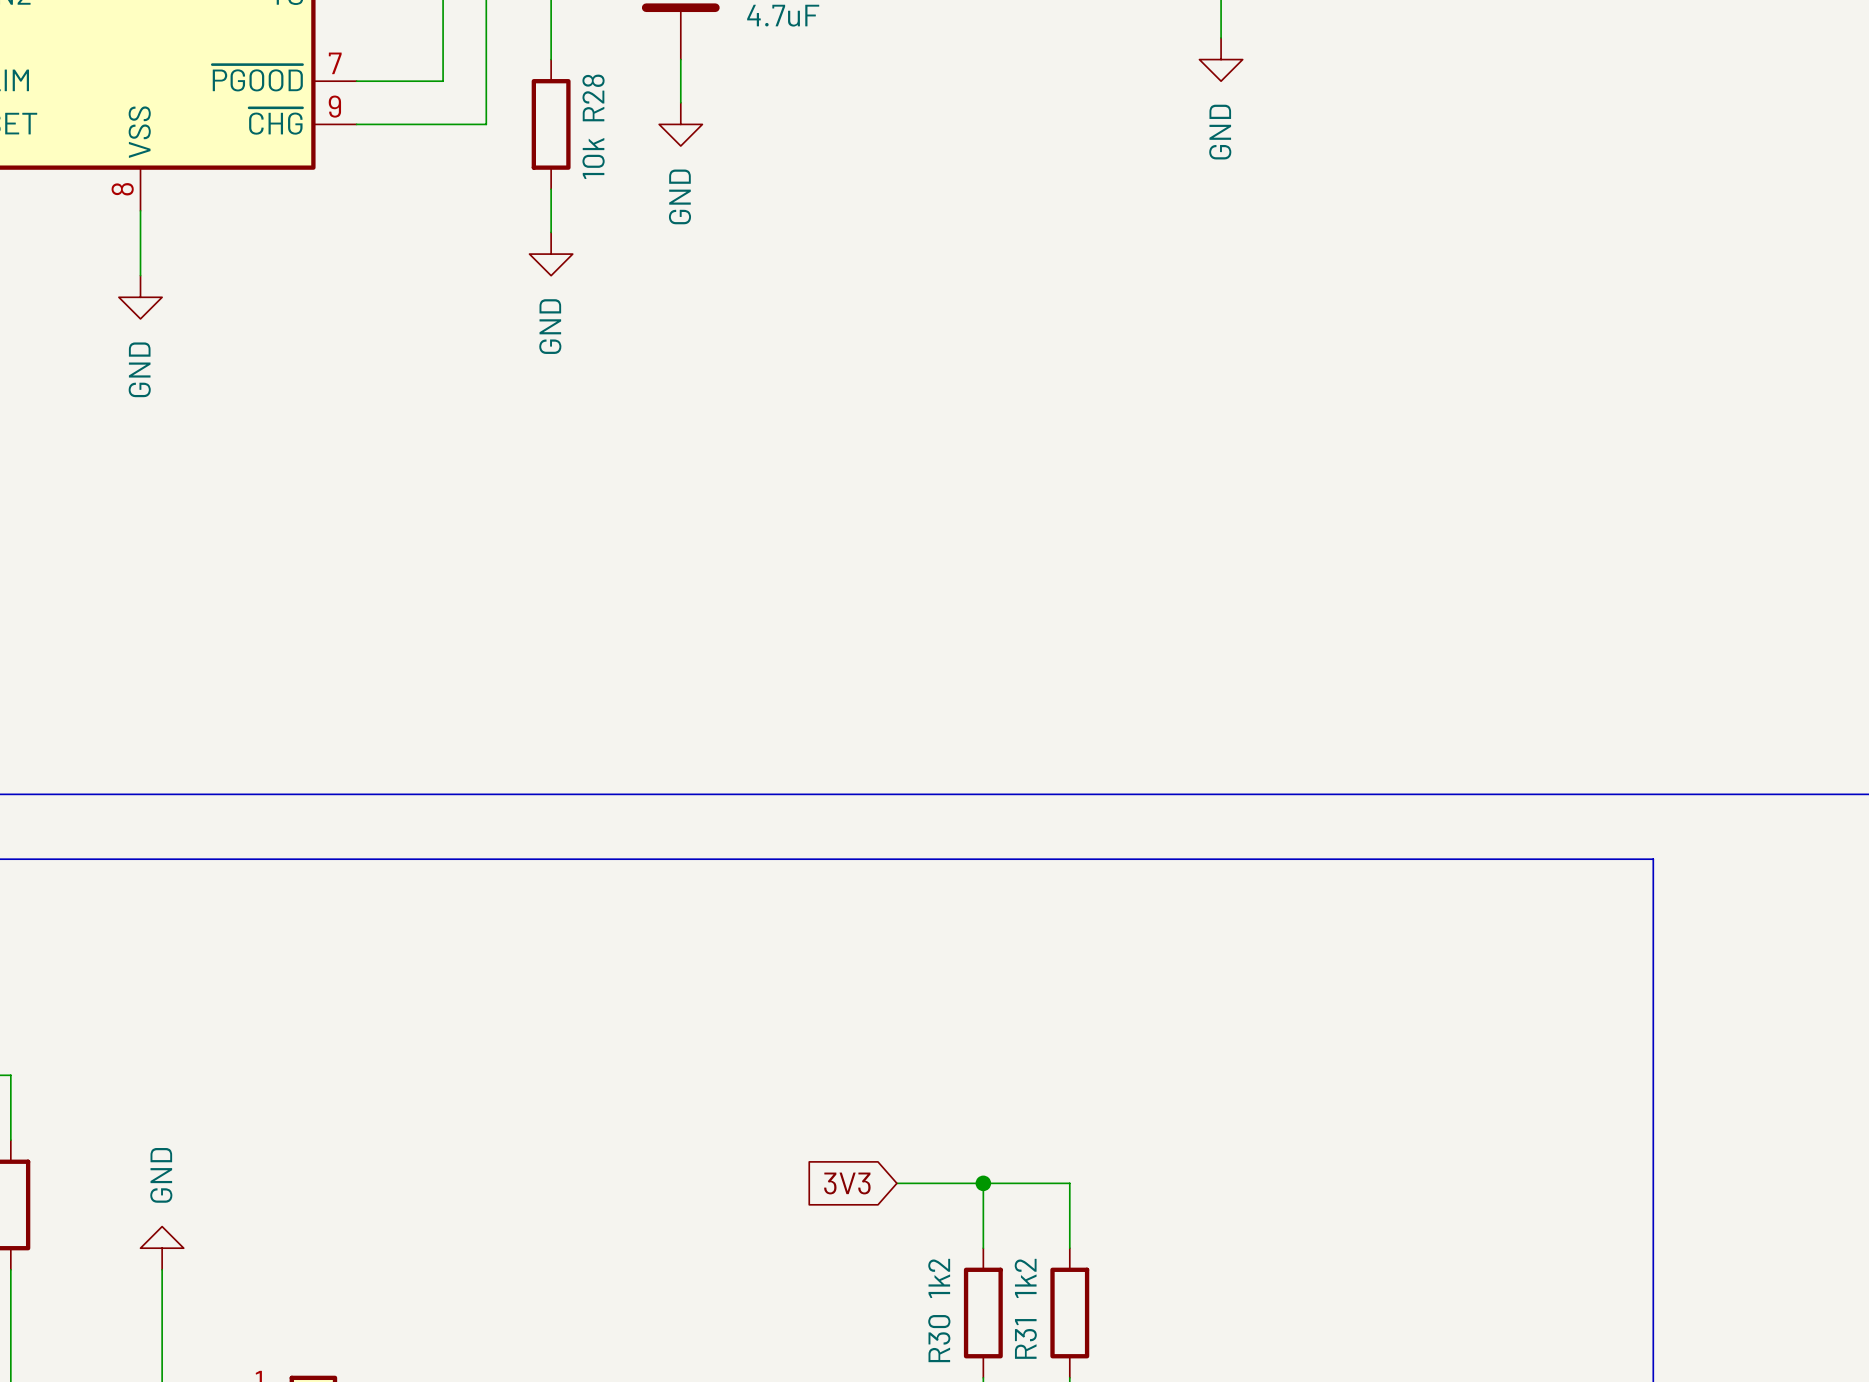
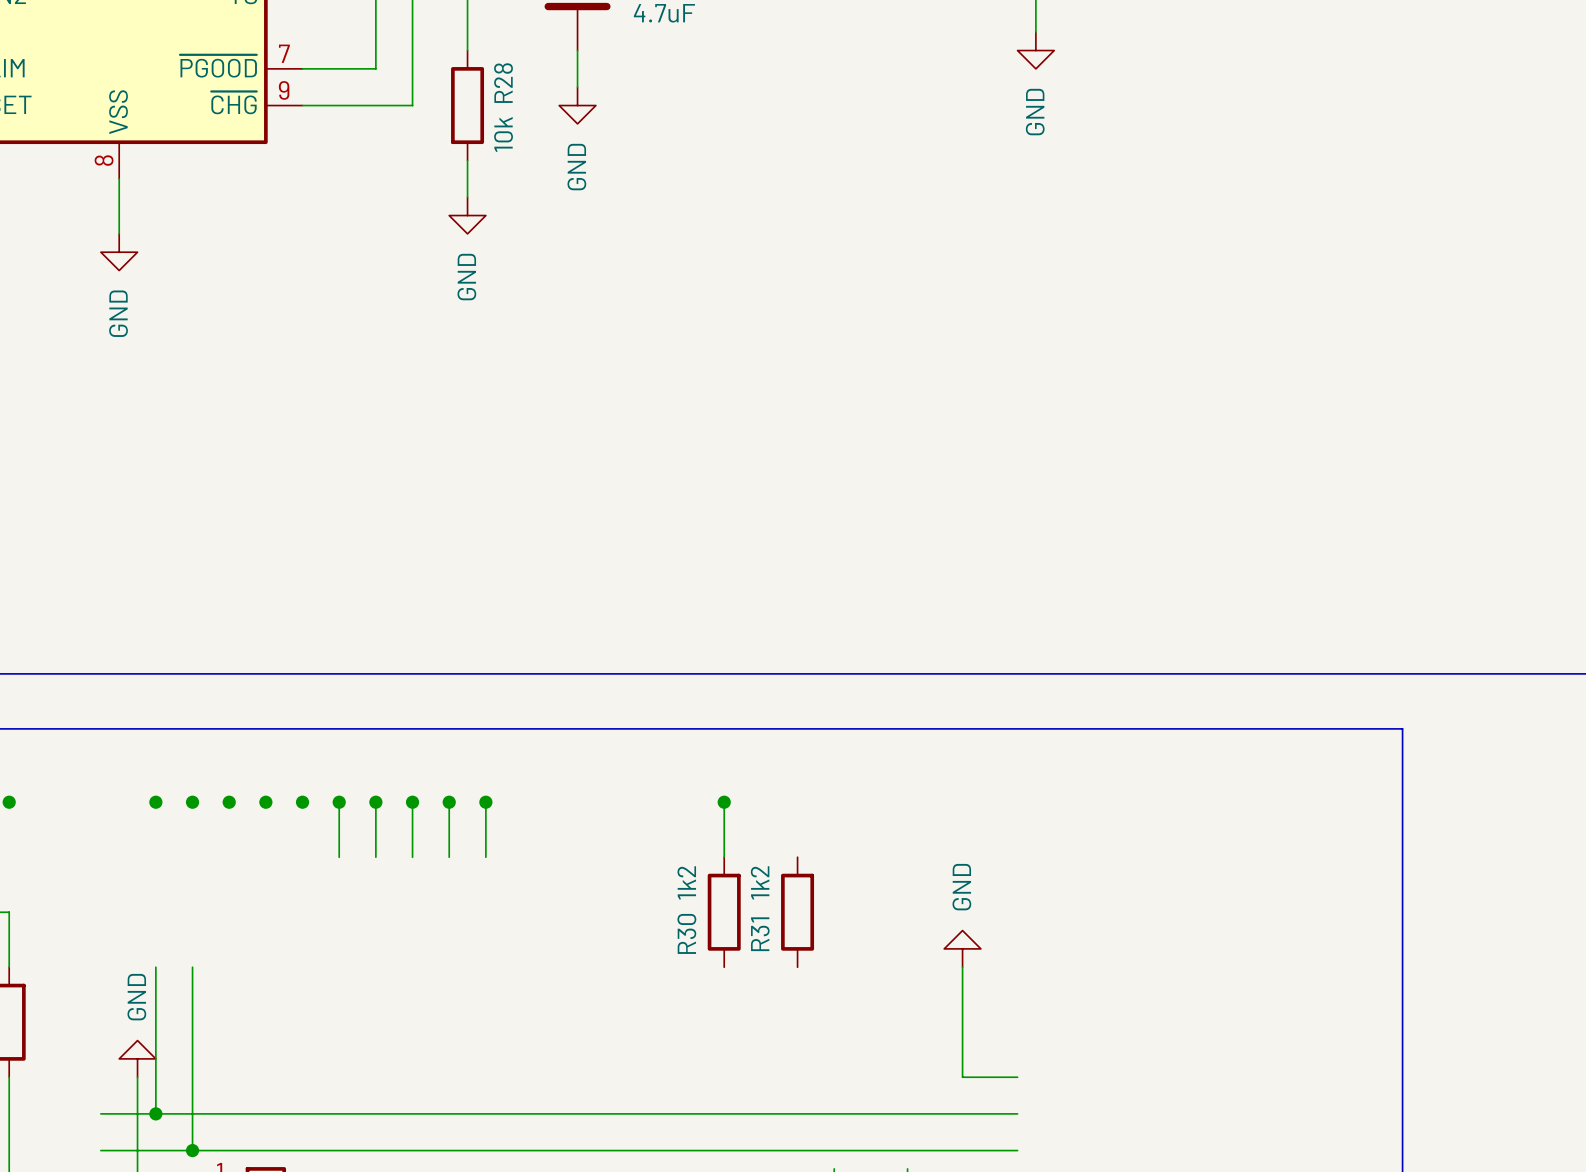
junction: none -> (9, 802)
junction: none -> (155, 802)
junction: none -> (192, 802)
junction: none -> (229, 802)
junction: none -> (265, 802)
junction: none -> (302, 802)
wire: none -> (339, 802) (339, 857)
junction: none -> (339, 802)
wire: none -> (375, 802) (375, 857)
junction: none -> (375, 802)
wire: none -> (412, 802) (412, 857)
junction: none -> (412, 802)
wire: none -> (449, 802) (449, 857)
junction: none -> (449, 802)
wire: none -> (485, 802) (485, 857)
junction: none -> (485, 802)
junction: none -> (724, 802)
power symbol: none -> GND (962, 948)
wire: none -> (155, 967) (155, 1113)
wire: none -> (192, 967) (192, 1150)
wire: none -> (962, 967) (962, 1077) (1017, 1077)
global label: 3V3 (847, 1183) -> none
wire: (896, 1183) (1069, 1183) (1069, 1248) -> none
wire: (983, 1183) (983, 1248) -> (724, 802) (724, 857)
junction: (983, 1183) -> none
wire: none -> (100, 1113) (1017, 1113)
junction: none -> (155, 1113)
R30 position: (983, 1313) -> (724, 912)
R31 position: (1069, 1313) -> (797, 912)
wire: none -> (100, 1150) (1017, 1150)
junction: none -> (192, 1150)

